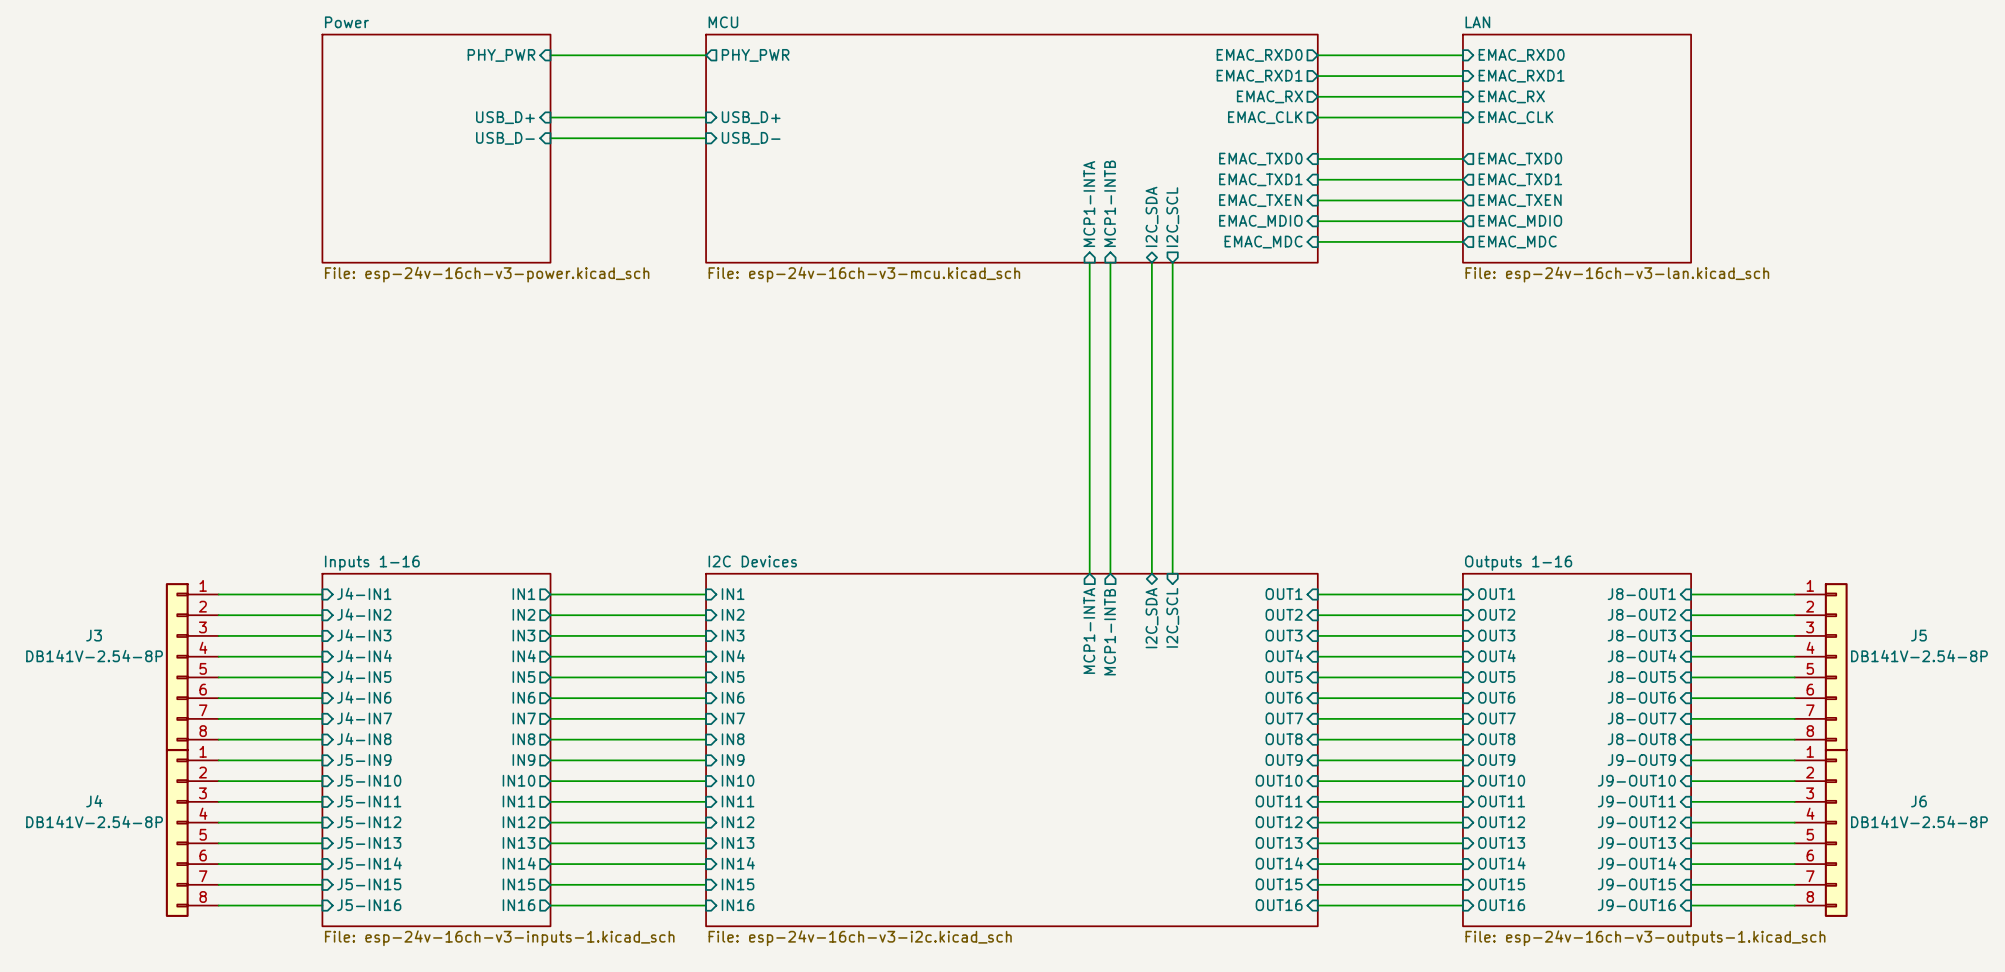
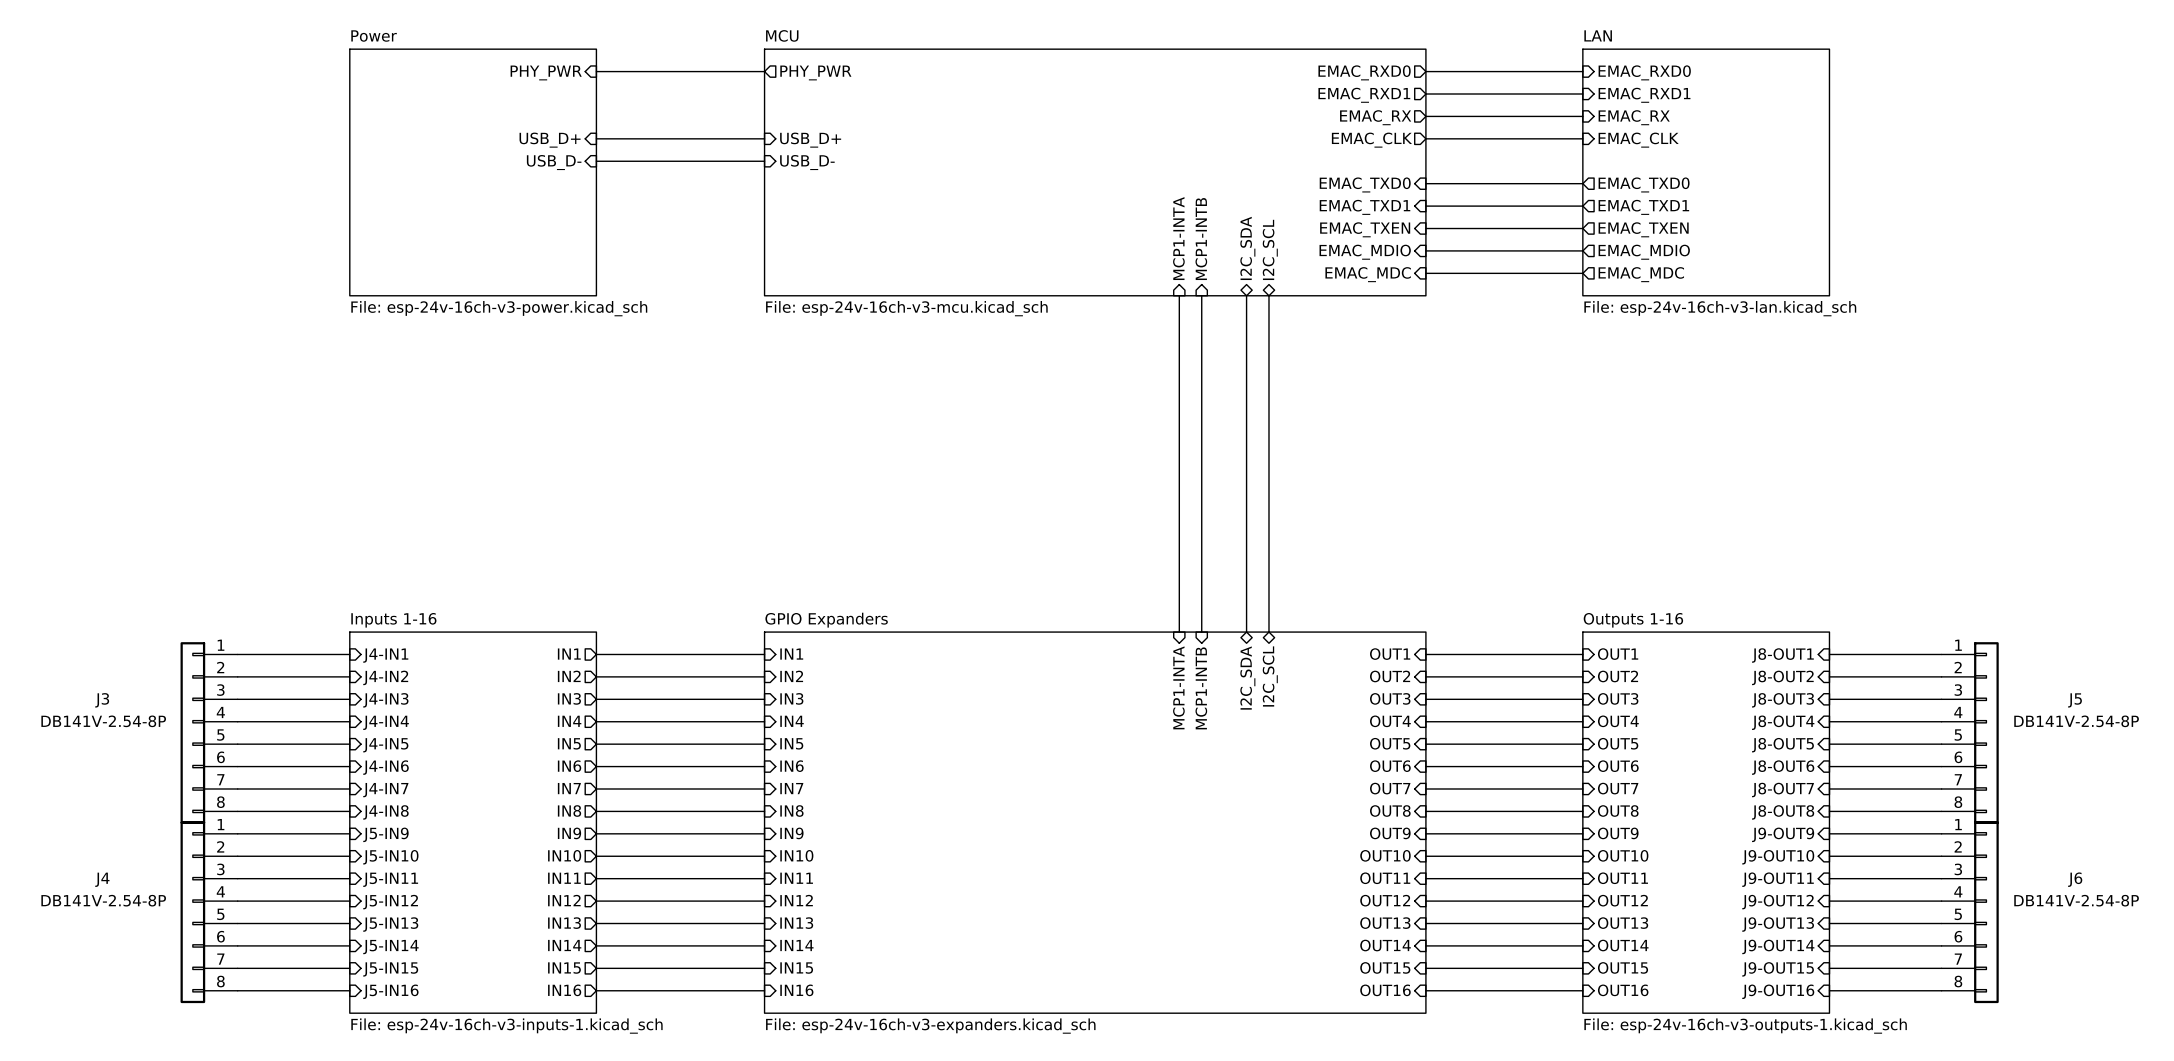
sheet pin shape: output (1172, 217) -> bidirectional (1270, 249)
sheet I2C Devices name: I2C Devices (752, 561) -> GPIO Expanders (826, 620)
sheet pin shape: input (1172, 617) -> bidirectional (1270, 676)
sheet pin shape: output (1089, 630) -> input (1178, 687)
sheet pin shape: output (1110, 632) -> input (1201, 688)
sheet I2C Devices value: File: esp-24v-16ch-v3-i2c.kicad_sch (860, 938) -> File: esp-24v-16ch-v3-expanders.kicad_sch (930, 1026)

